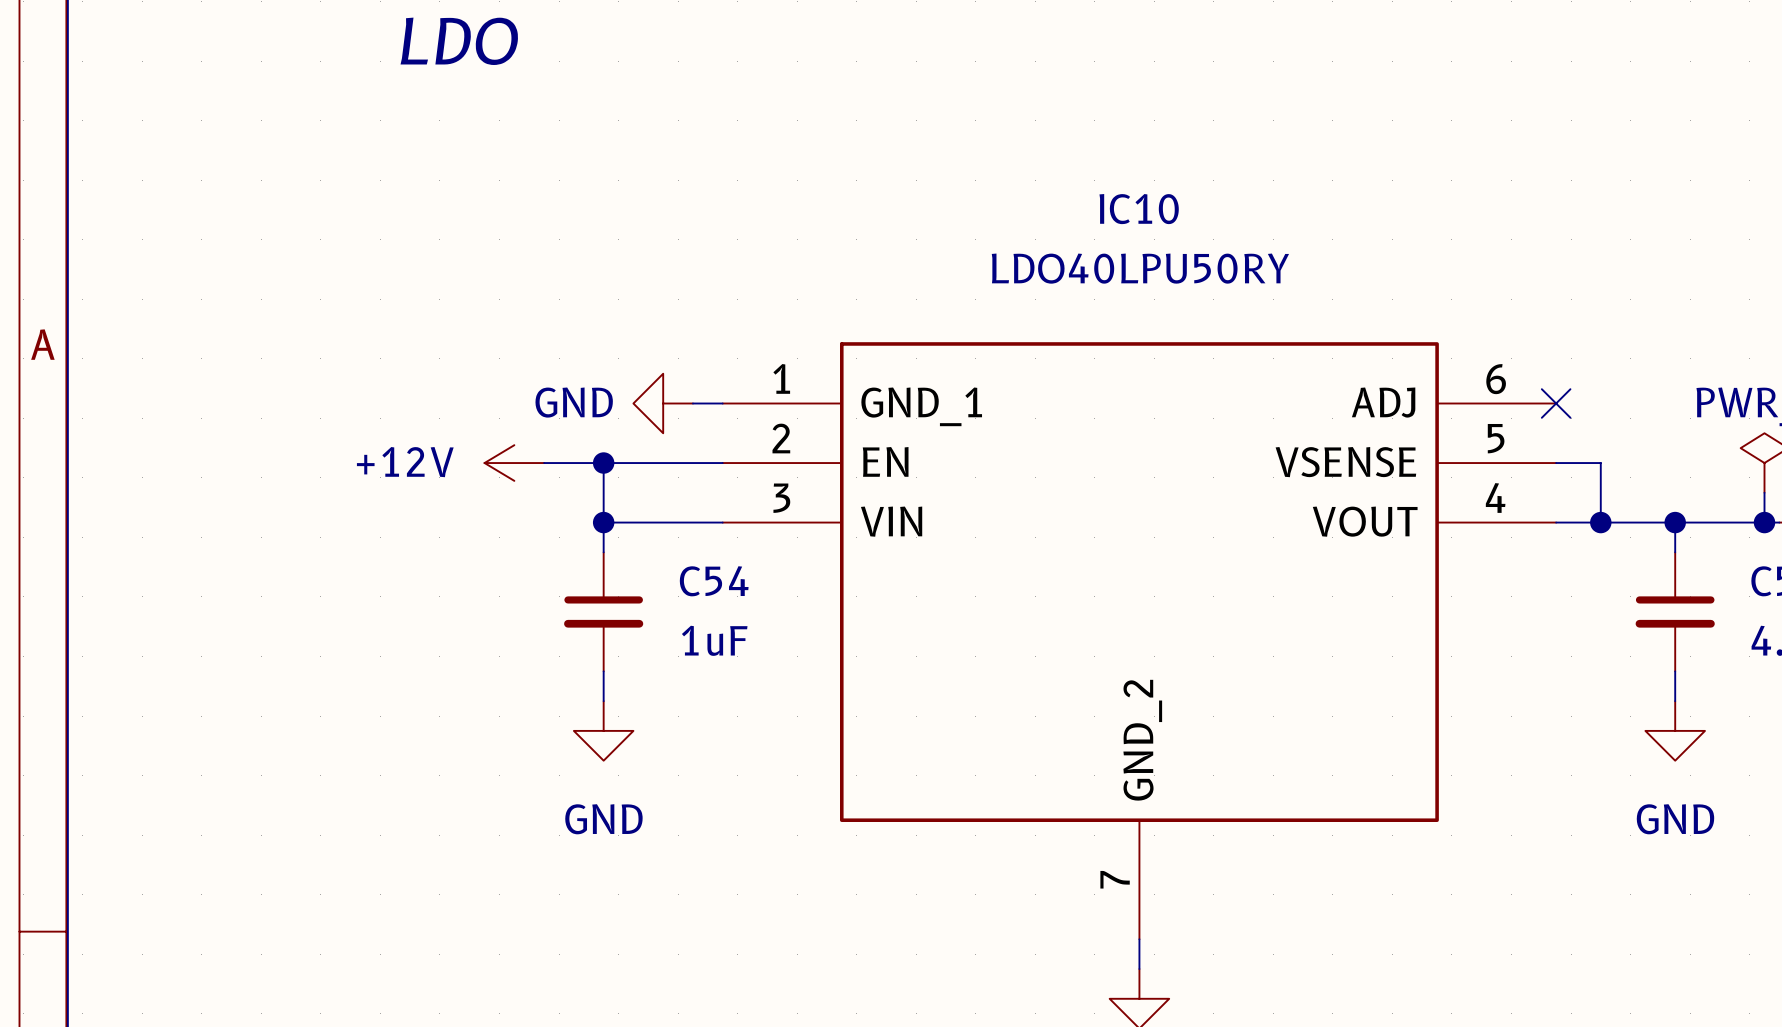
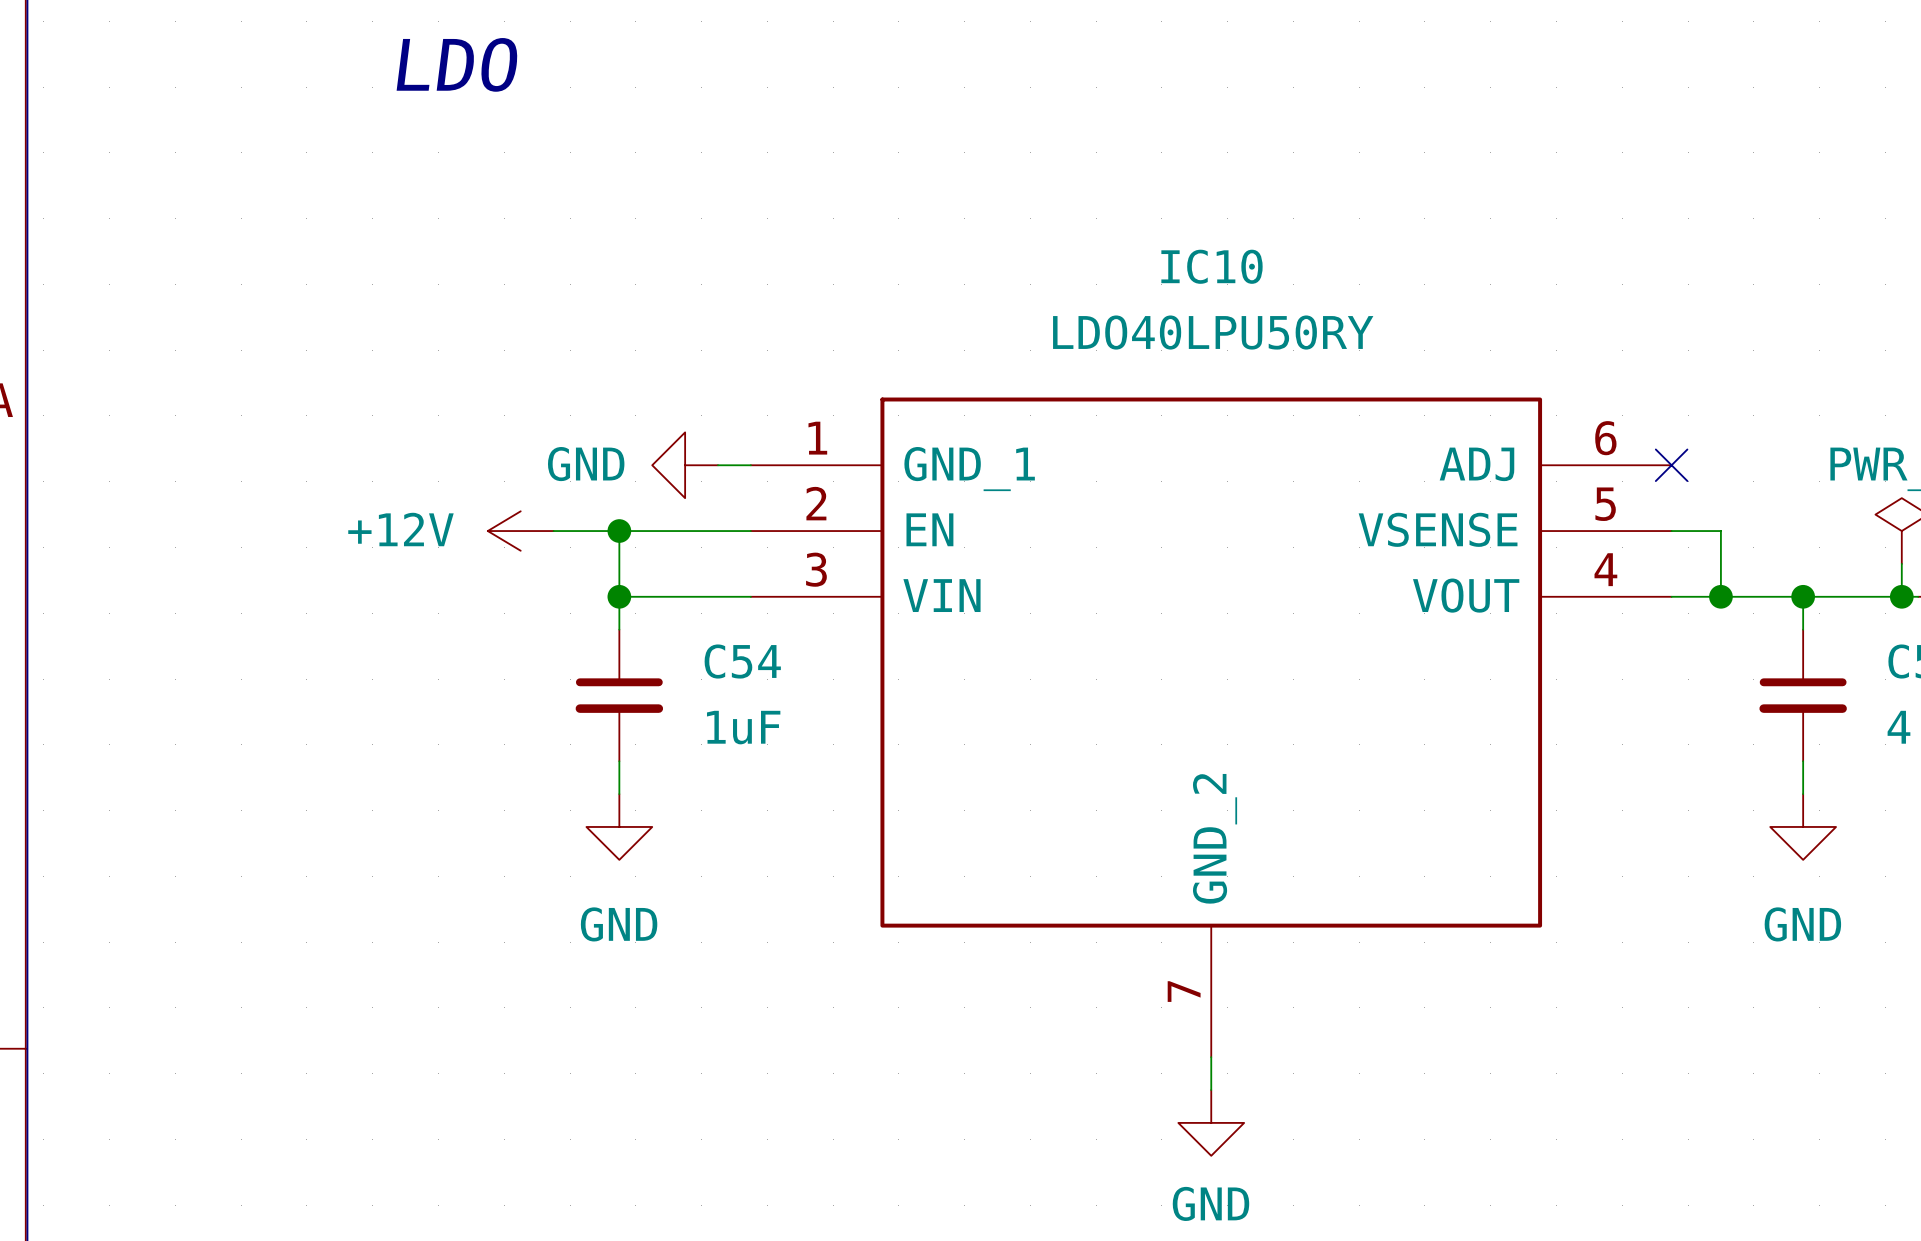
IC10 name position: IC10 (1139, 209) -> IC10 (1212, 266)
IC10 value position: LDO40LPU50RY (1140, 268) -> LDO40LPU50RY (1213, 332)

